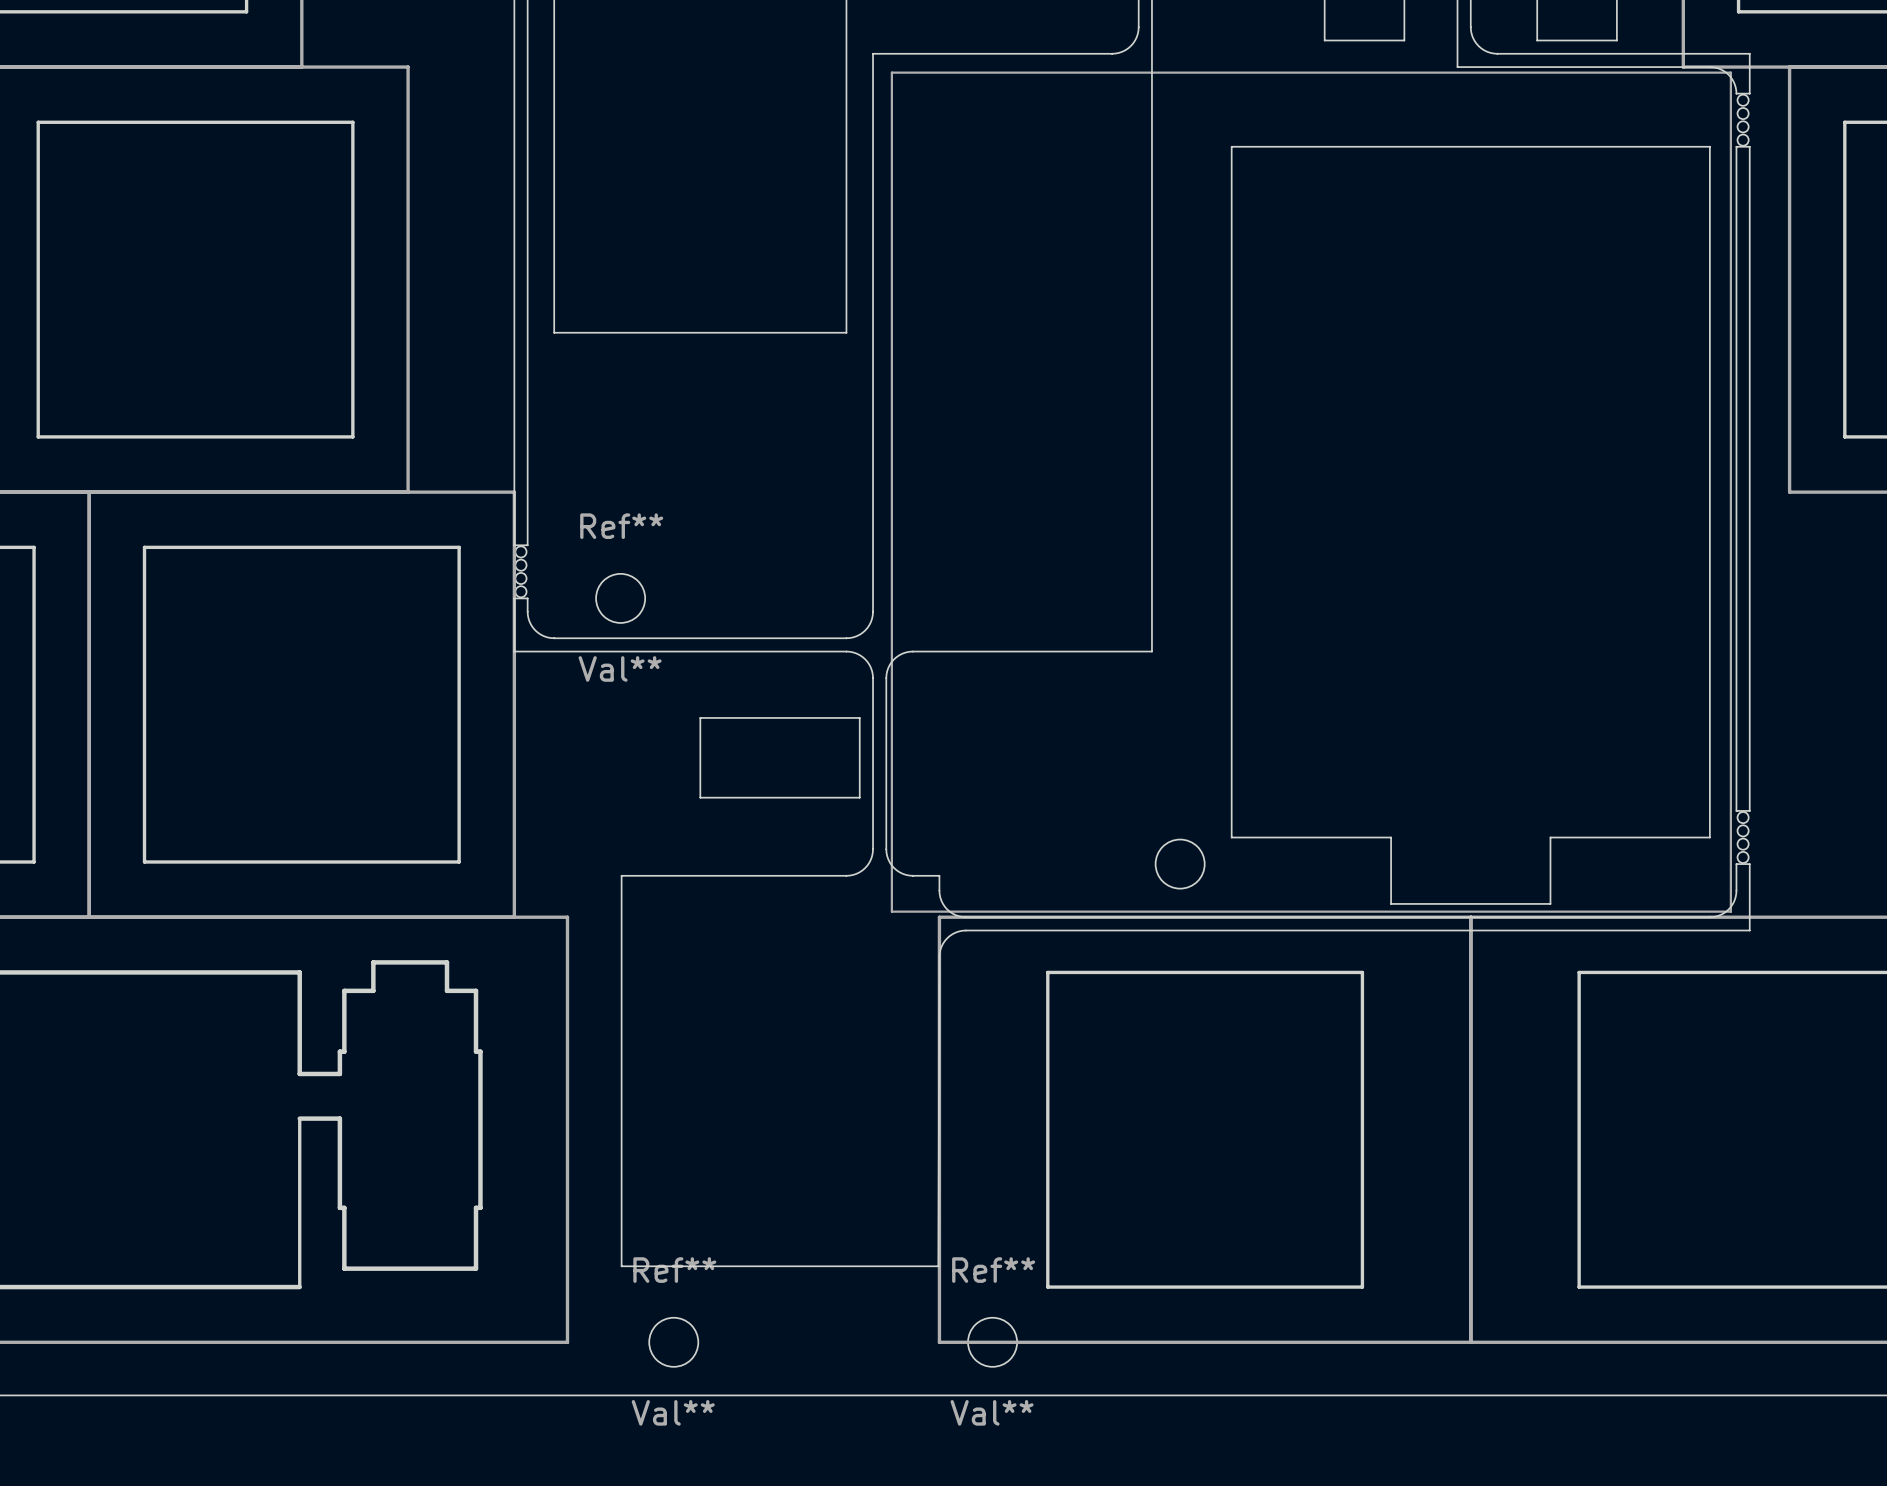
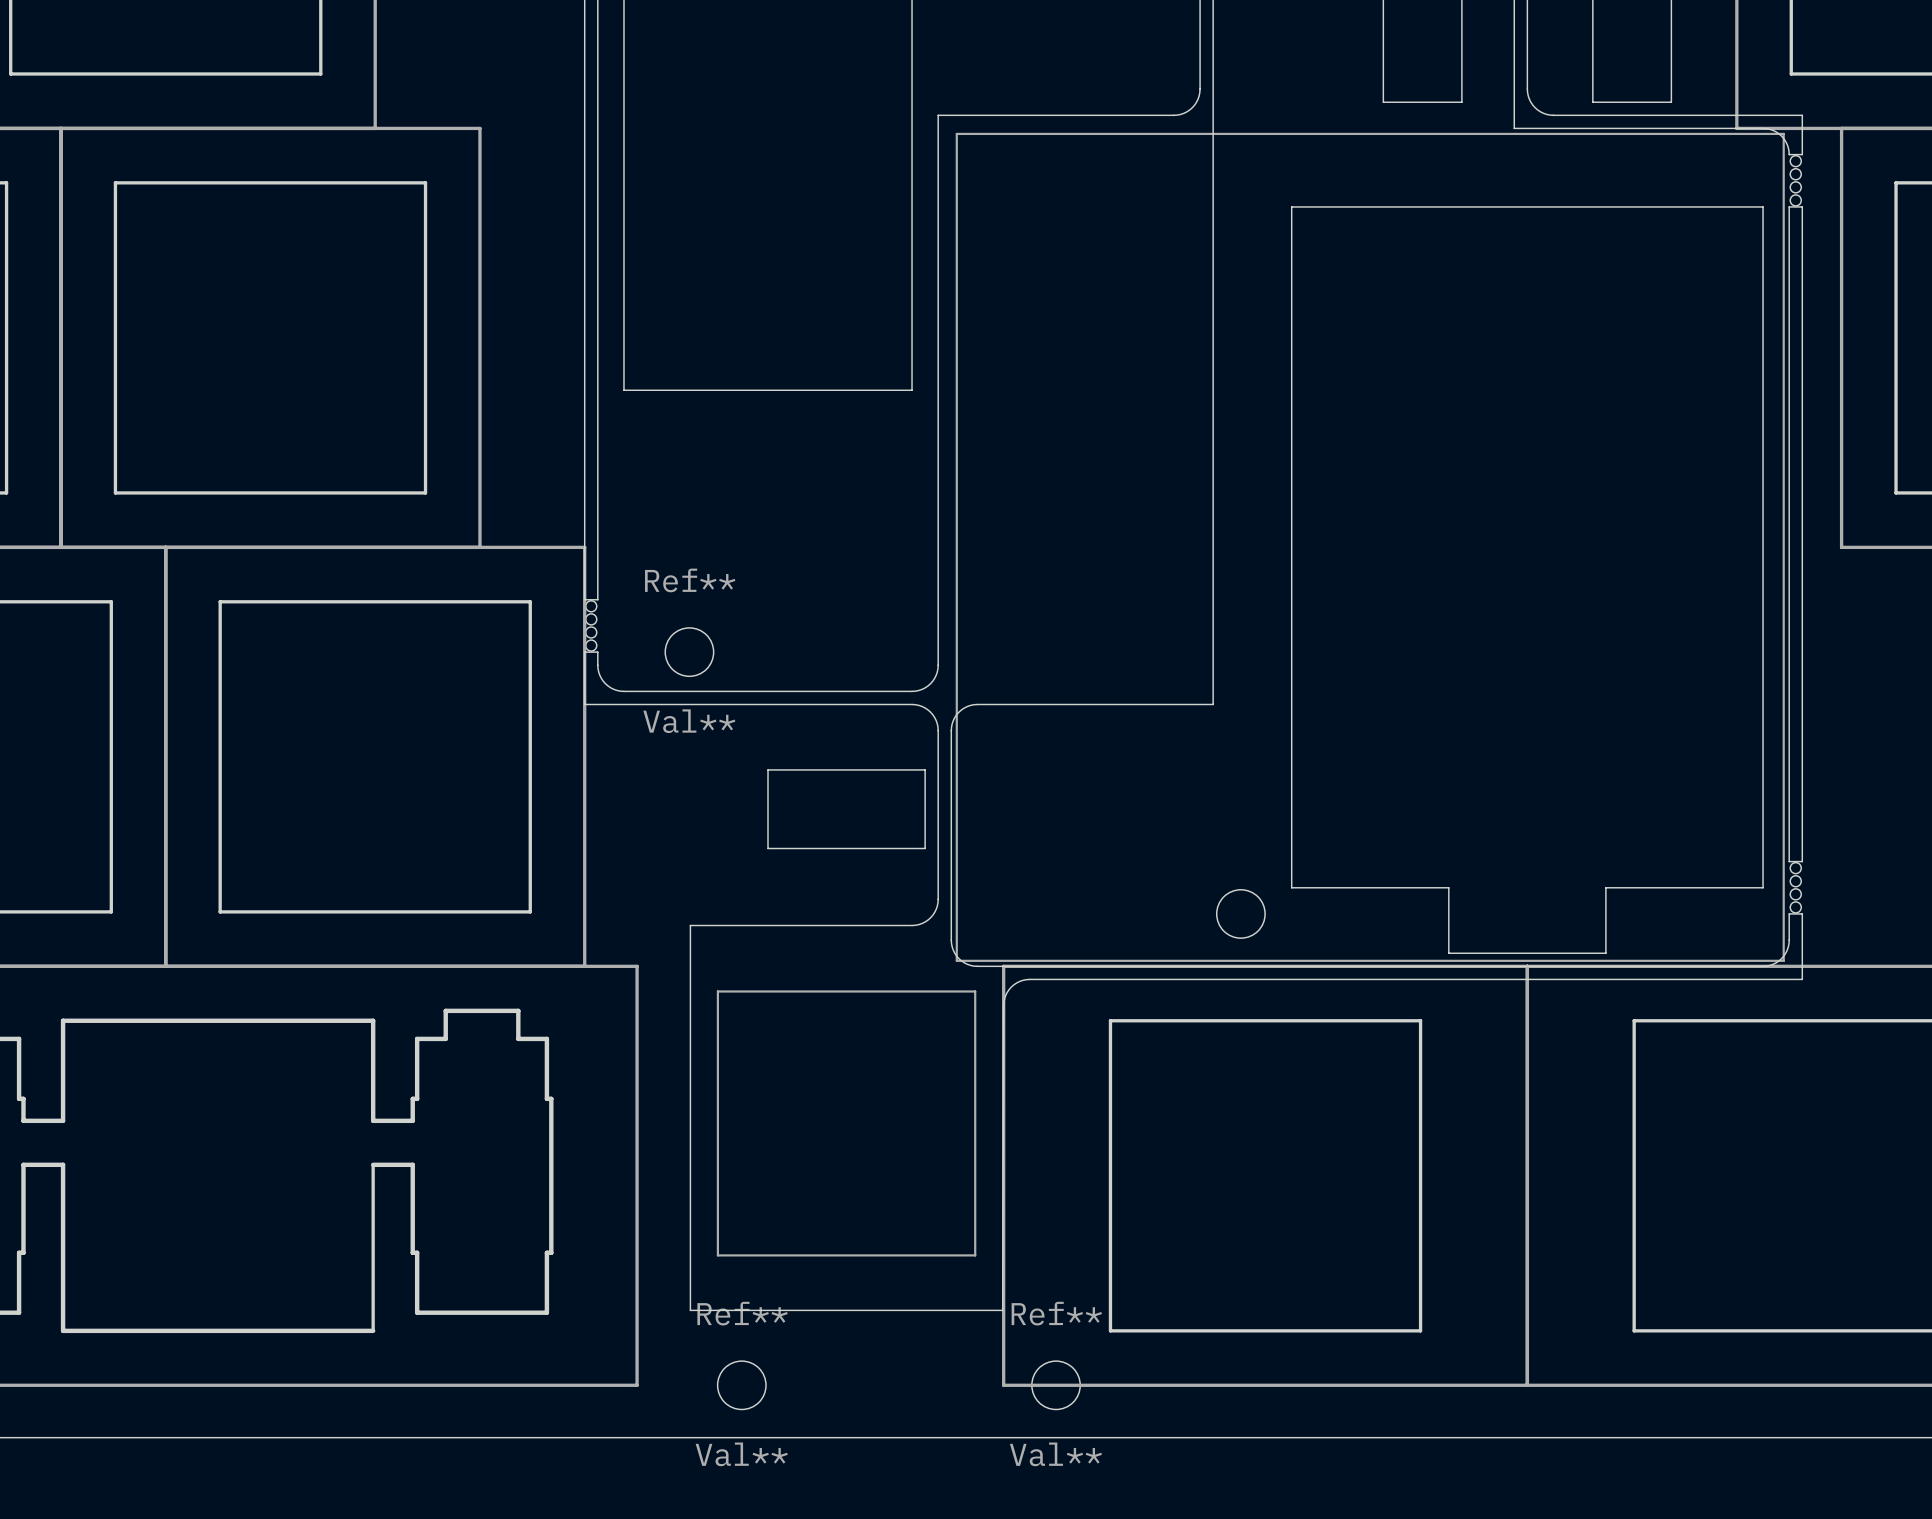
board edge: (886, 849) (889, 862) (899, 872) (909, 875) (939, 875) (939, 894) (942, 903) (952, 913) (966, 917) -> (951, 899) (951, 943) (954, 953) (961, 960) (974, 966) (1029, 966)
line: none -> (717, 991) (717, 1255) (975, 1255) (975, 991) (717, 991)

